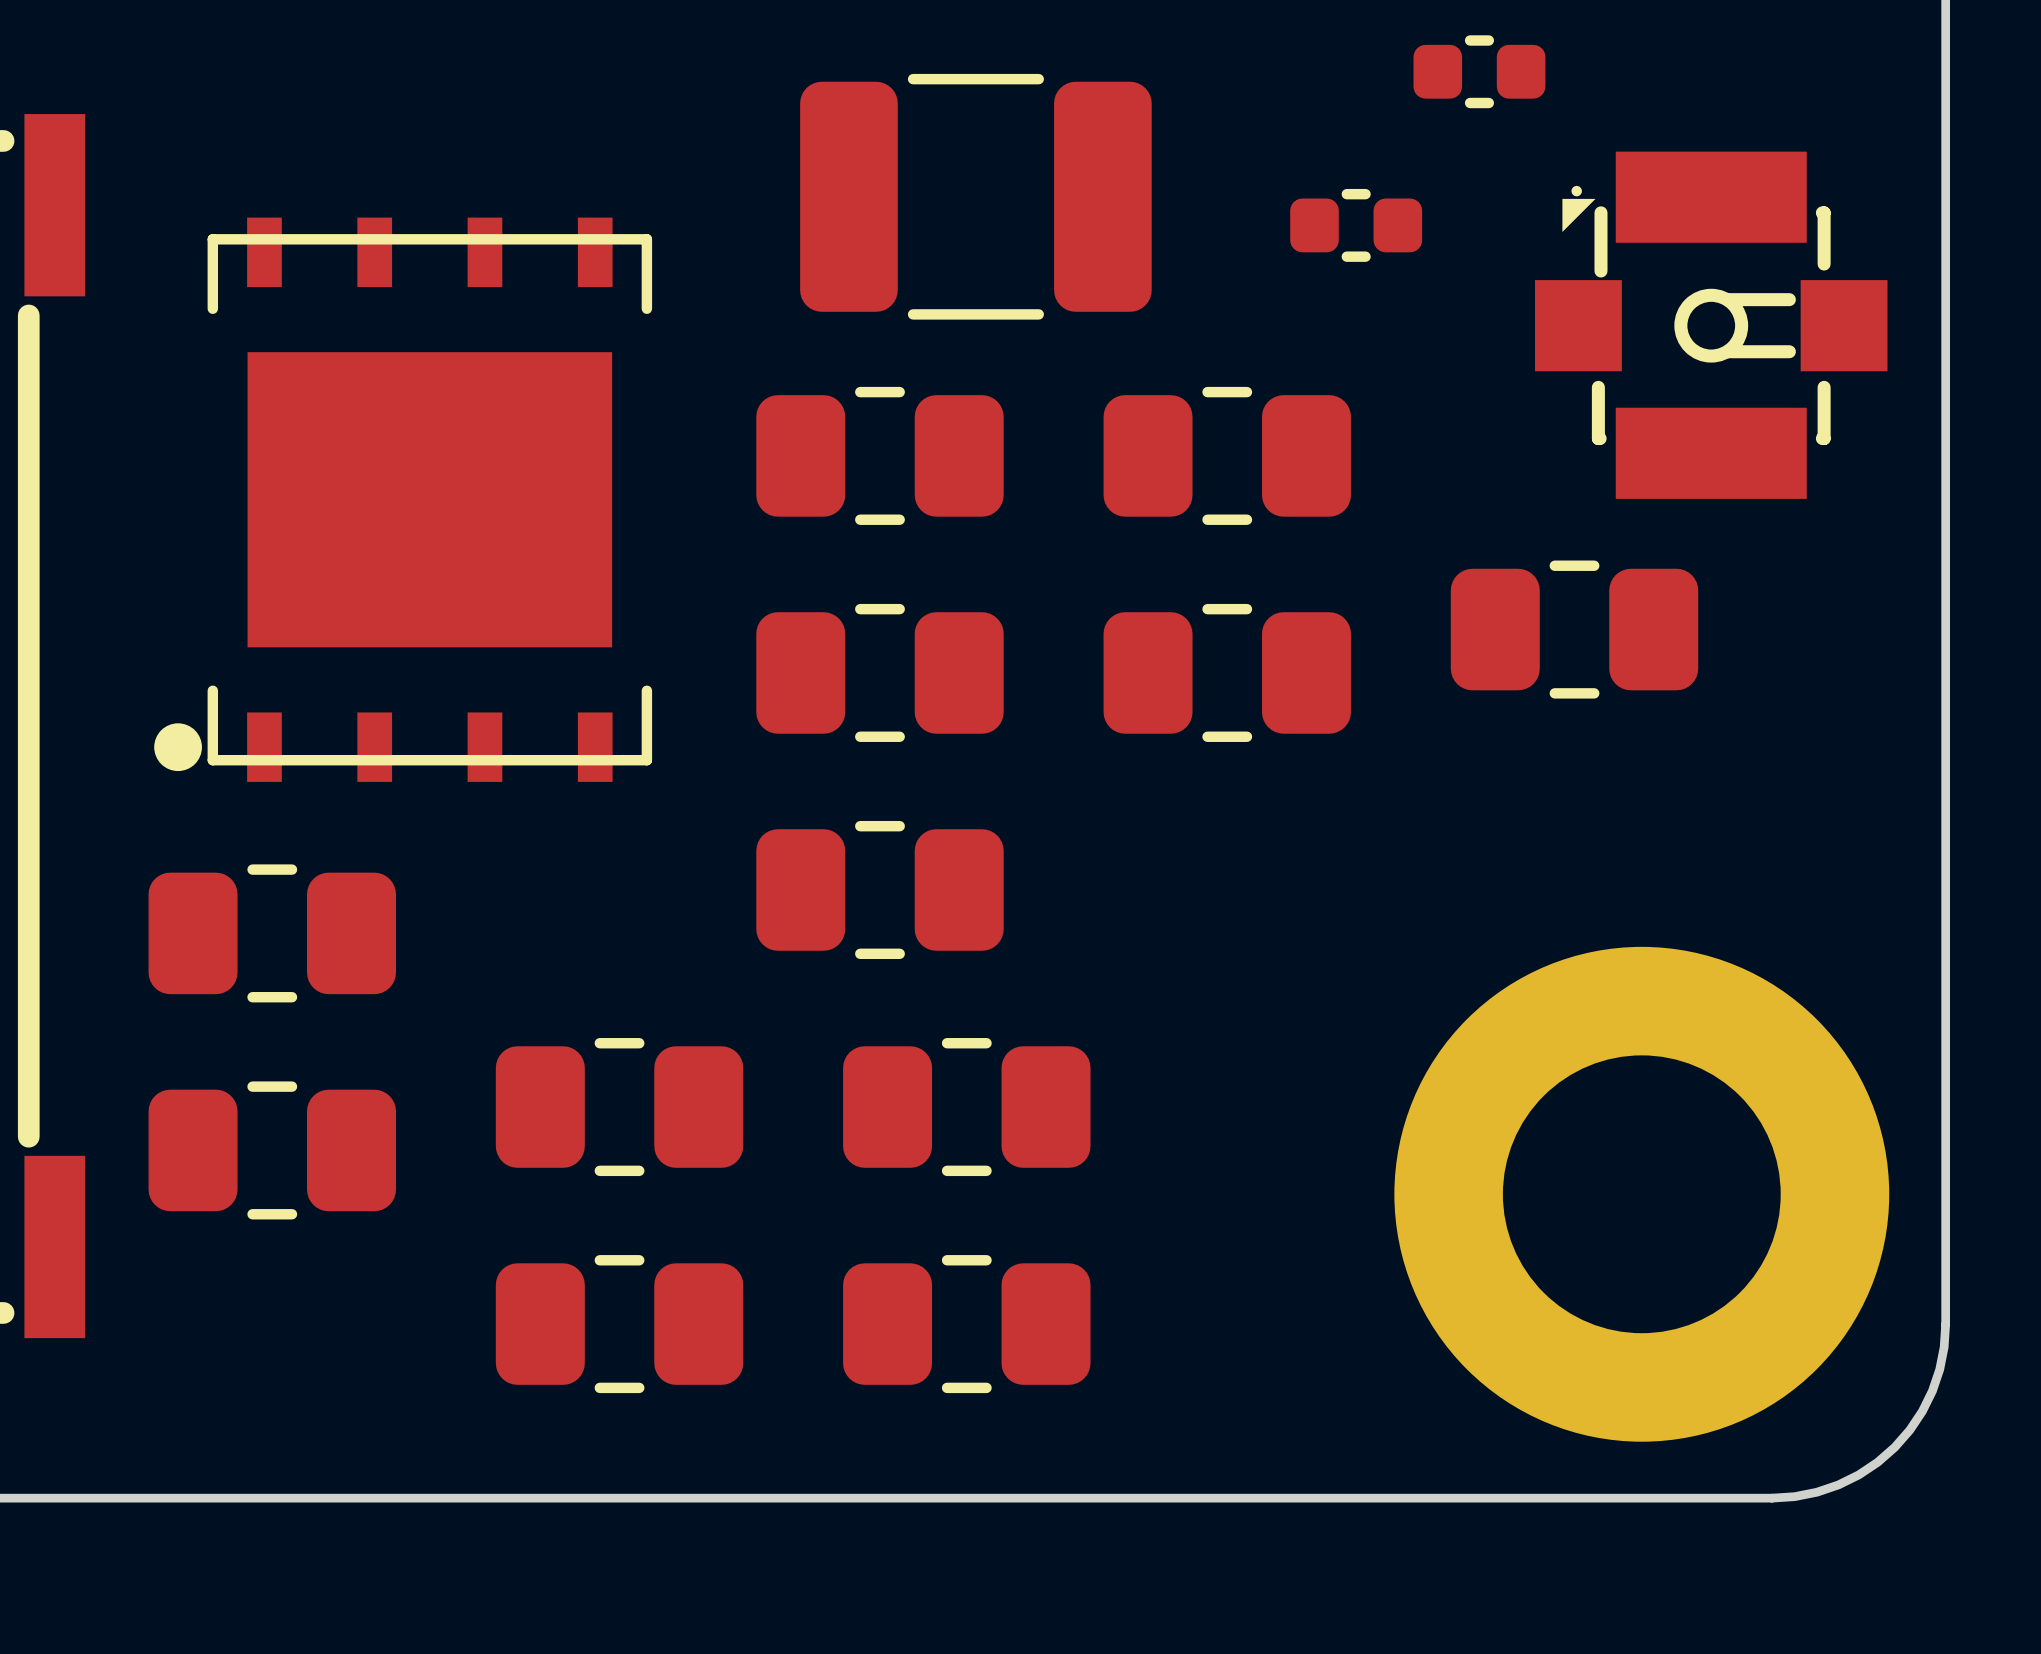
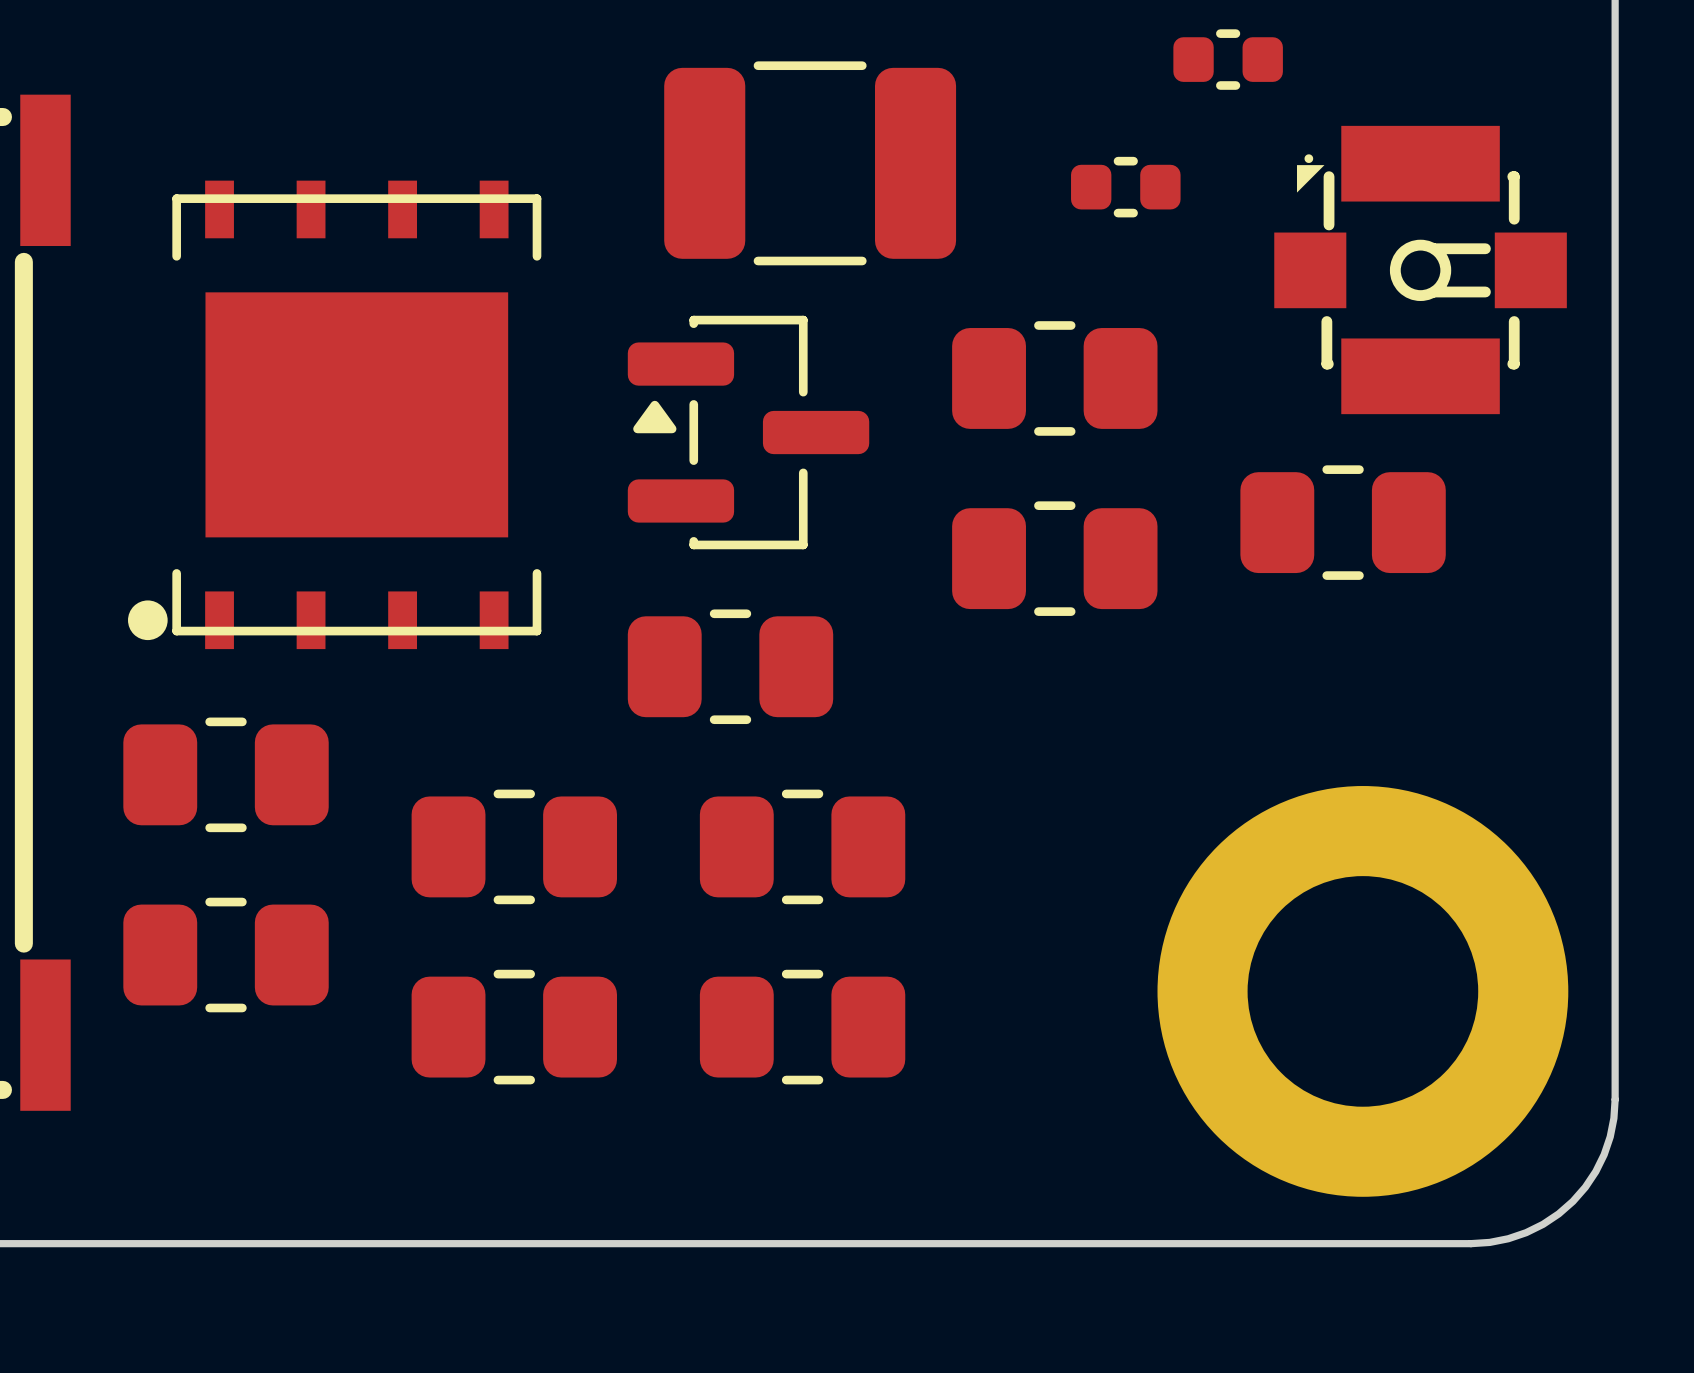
part footprint: [756, 386, 1004, 525] -> [627, 315, 870, 550]
part position: (1227, 455) -> (1054, 378)
part position: (1574, 629) -> (1343, 522)
part: (879, 672) -> none
part position: (1227, 672) -> (1054, 558)
part: none -> (730, 666)
part: (879, 889) -> none
part: none -> (514, 846)
part: none -> (802, 846)
part: (619, 1107) -> none
part: (966, 1107) -> none
part: none -> (514, 1027)
part: none -> (802, 1027)
part: (619, 1324) -> none
part: (966, 1324) -> none

